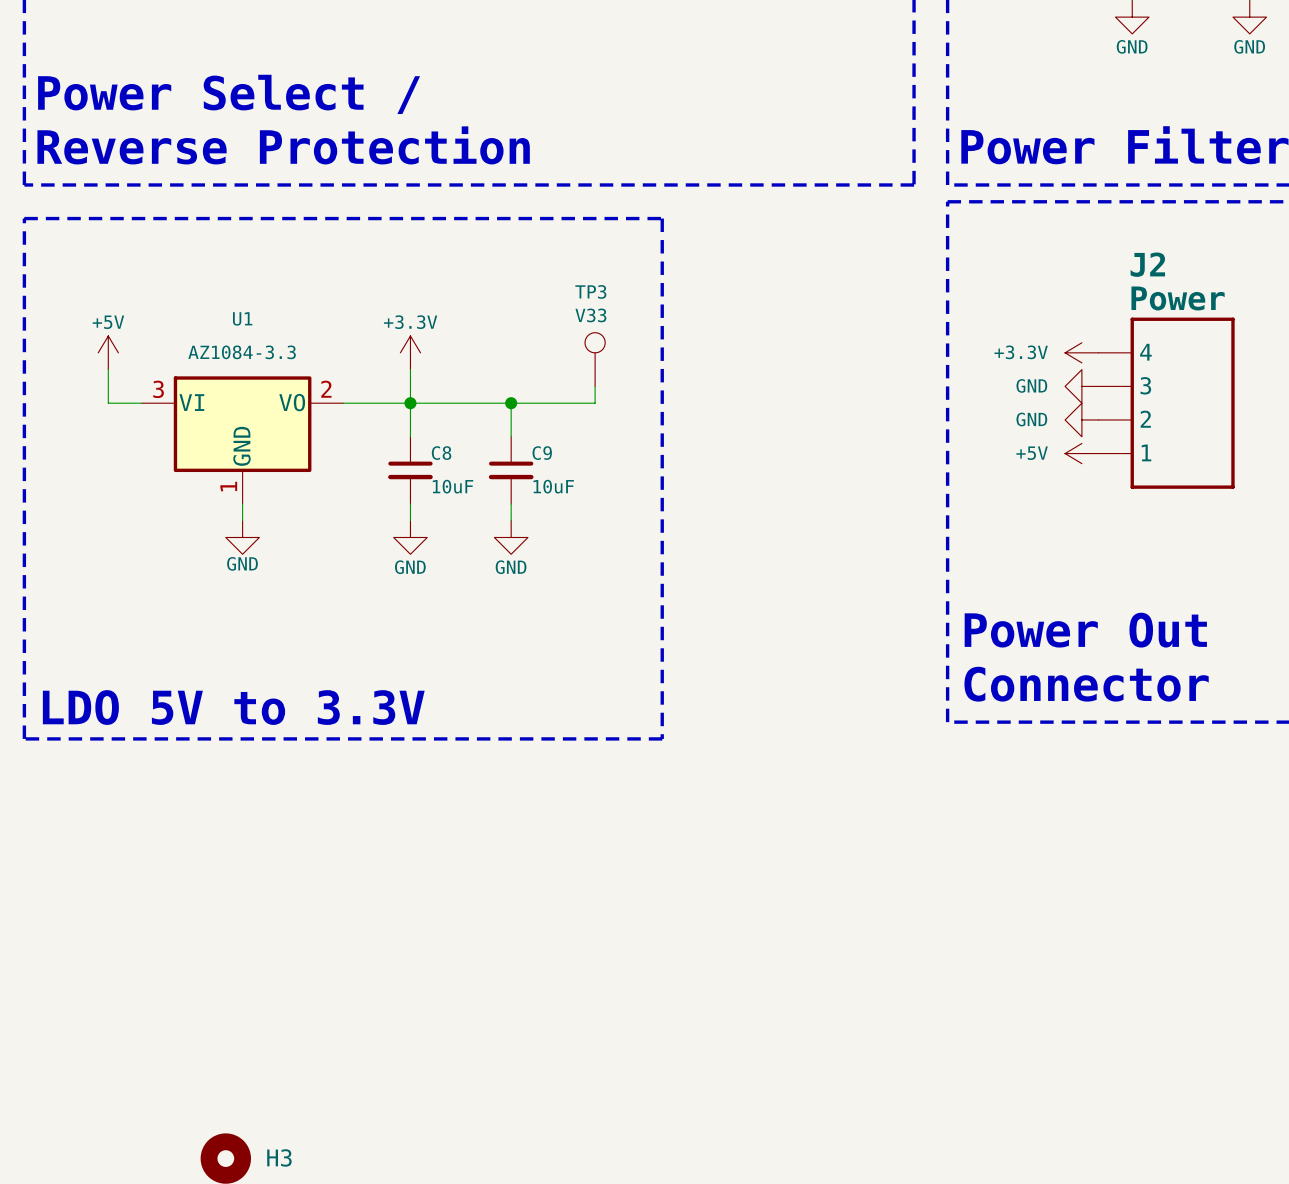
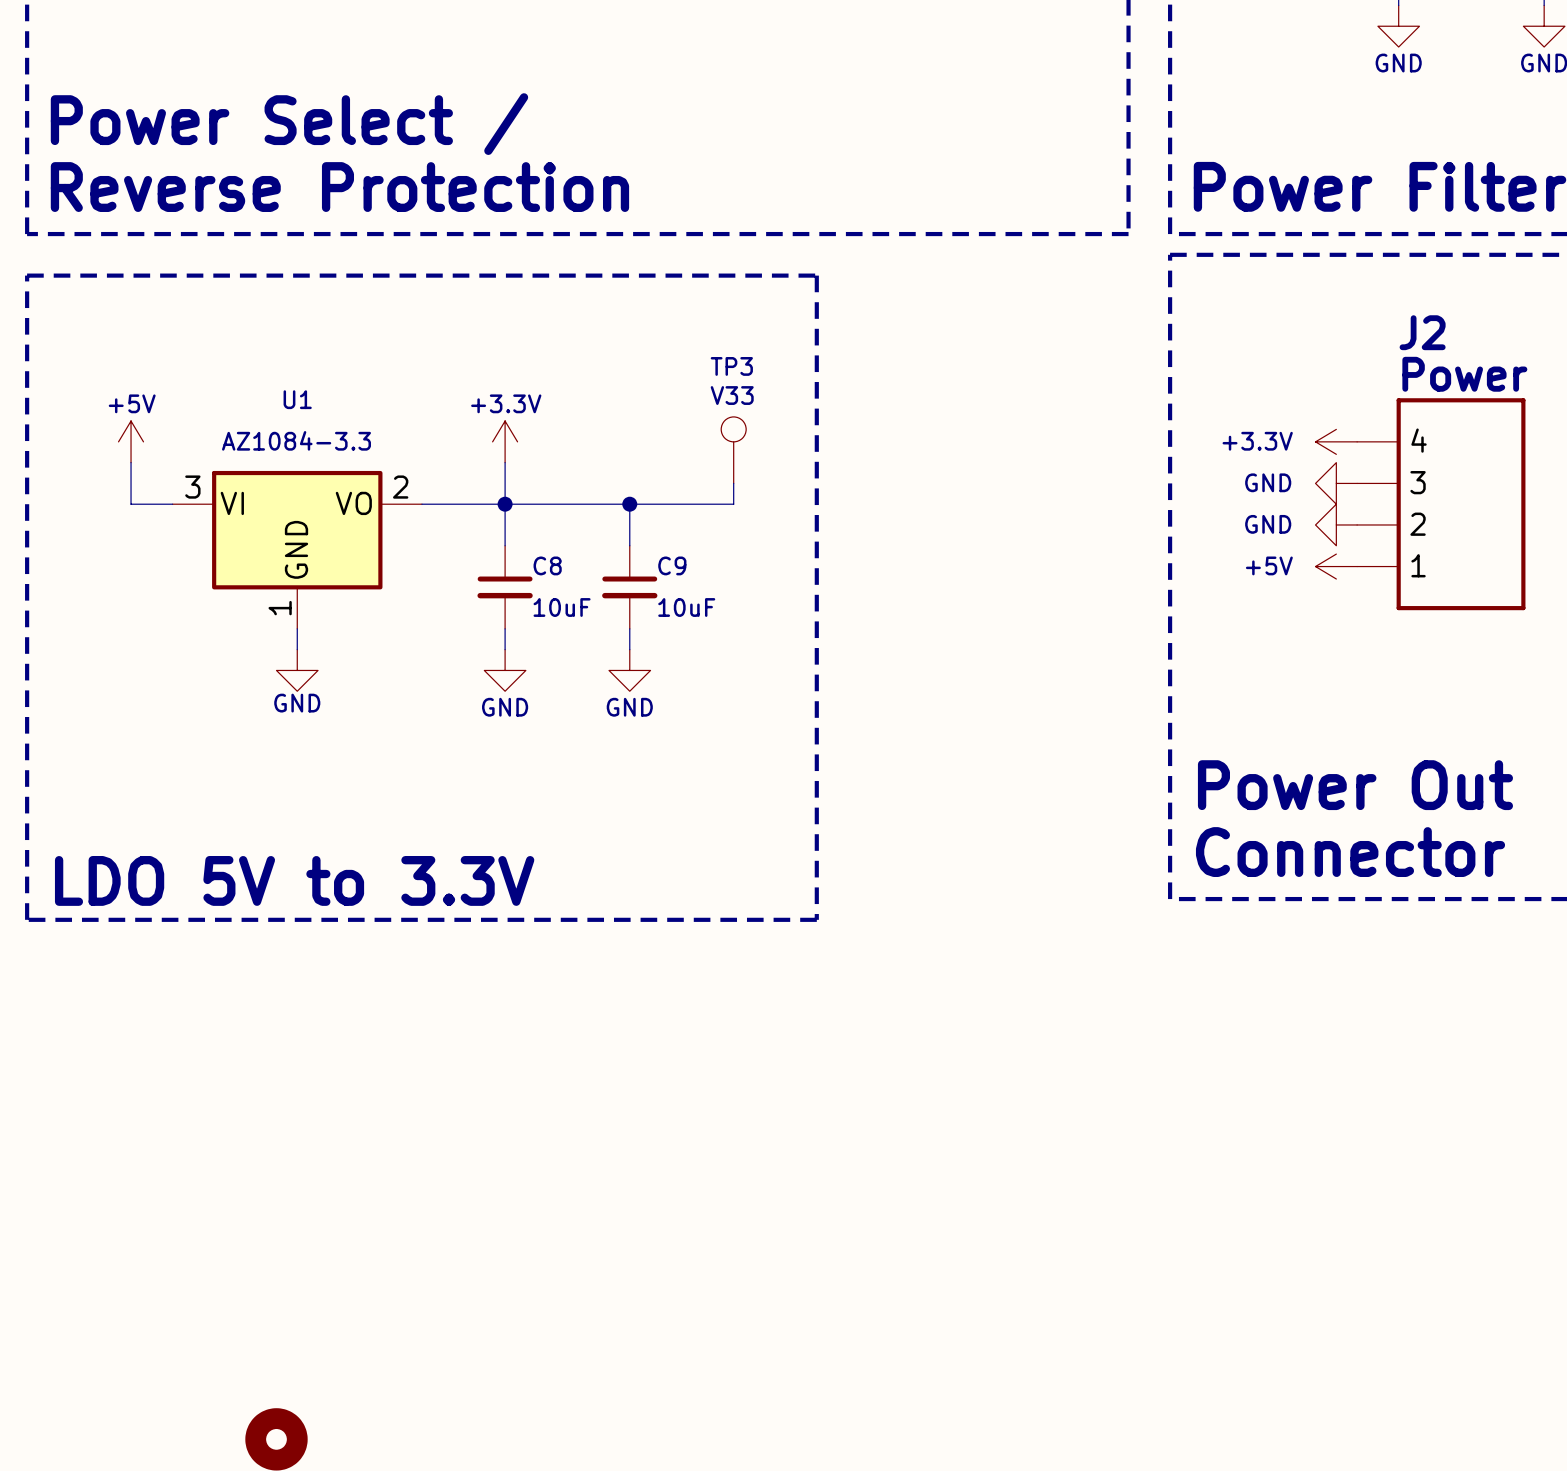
H3 name: H3 (279, 1157) -> none

